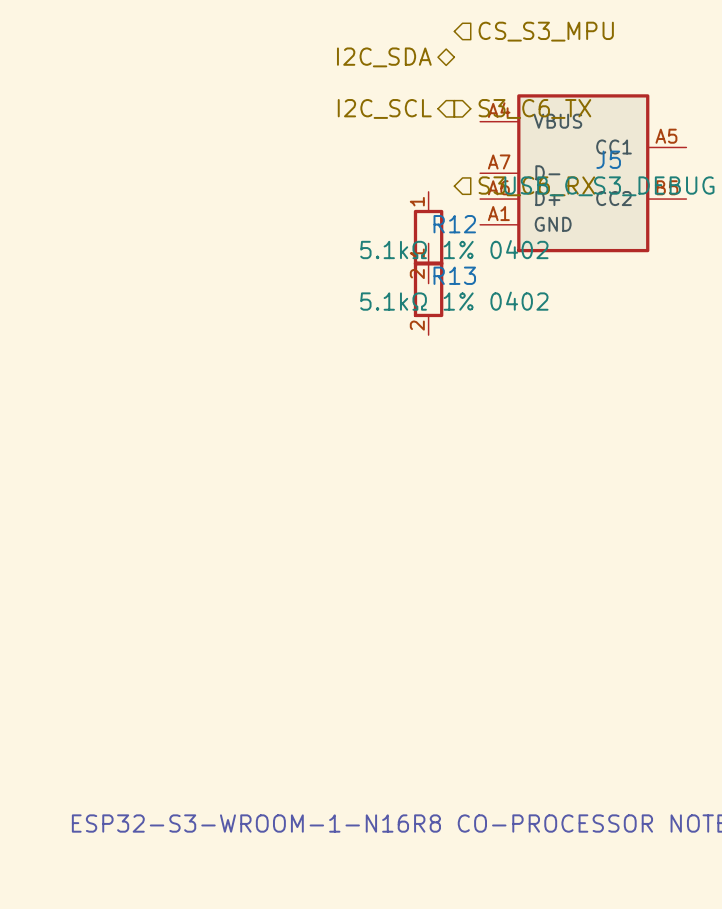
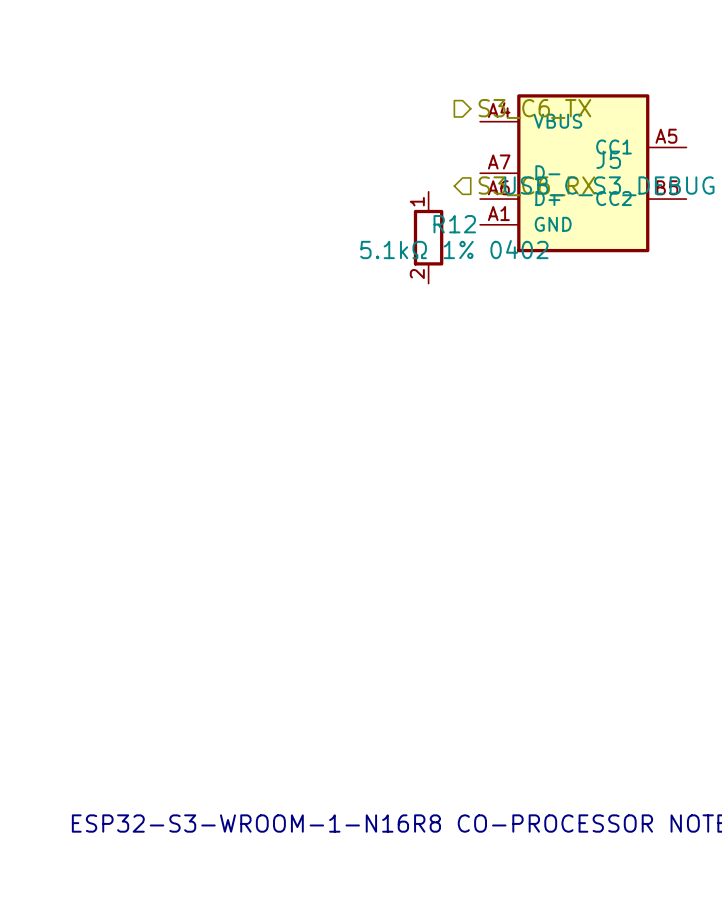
hierarchical label: CS_S3_MPU (546, 31) -> none
hierarchical label: I2C_SDA (384, 57) -> none
hierarchical label: I2C_SCL (384, 108) -> none
R13: 5.1kΩ 1% 0402 (428, 289) -> none

